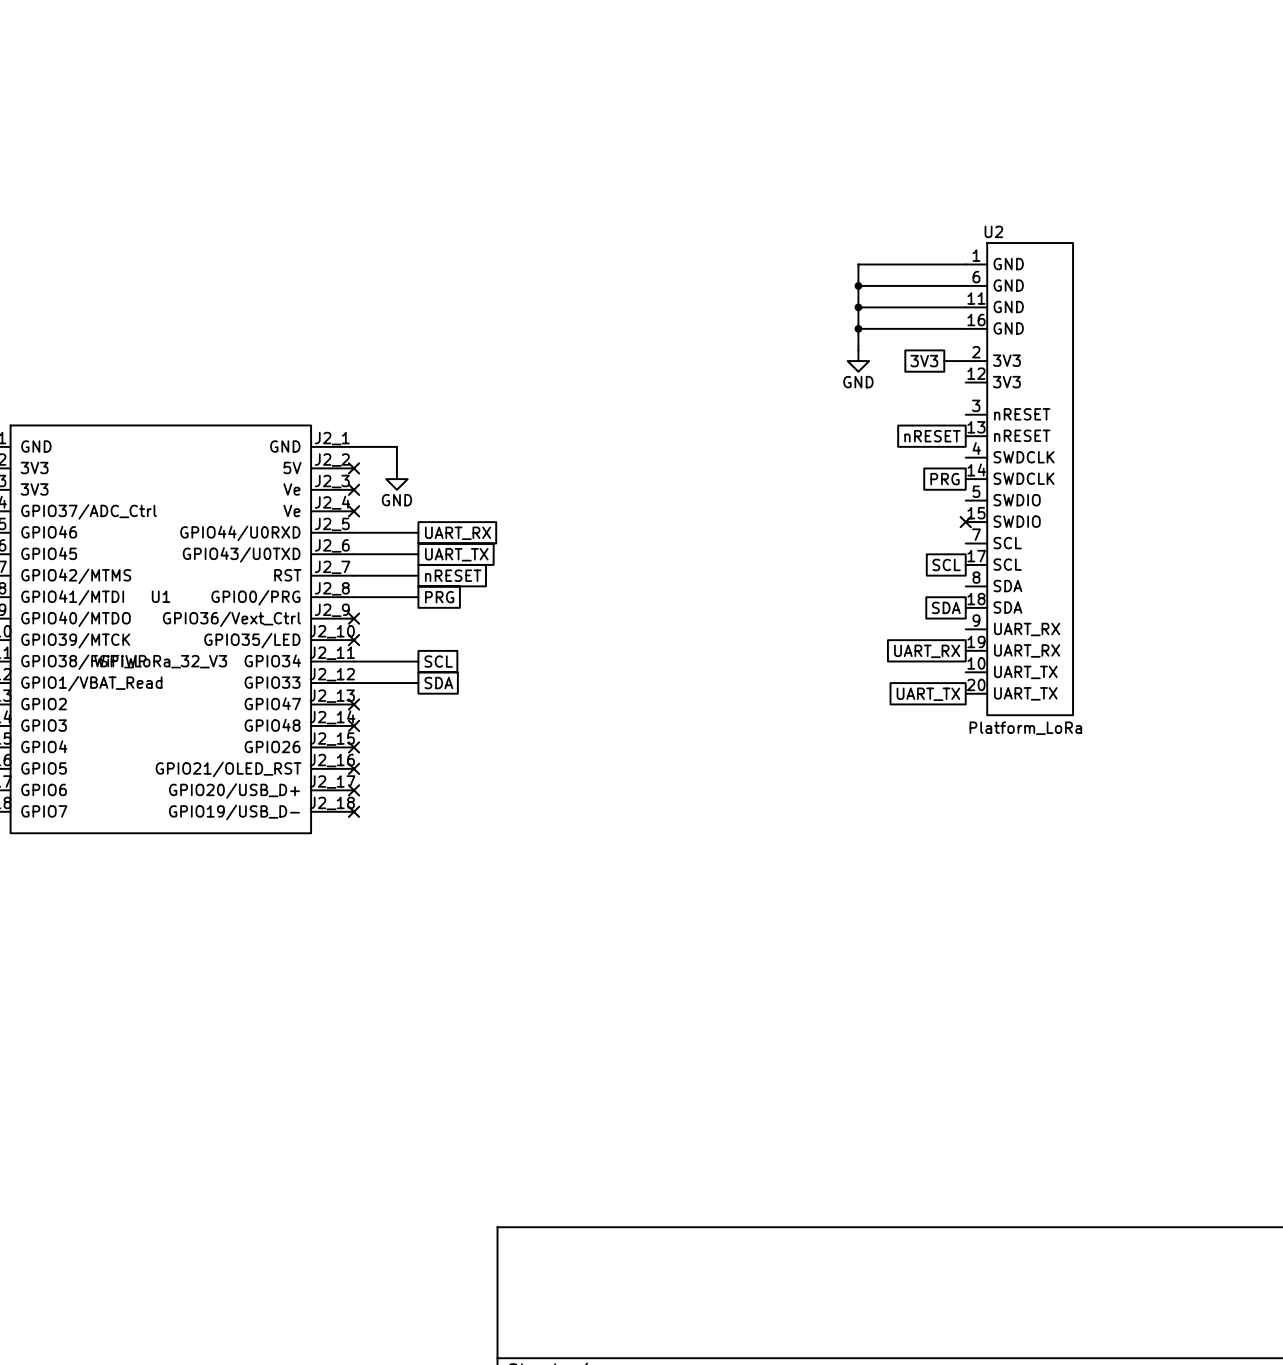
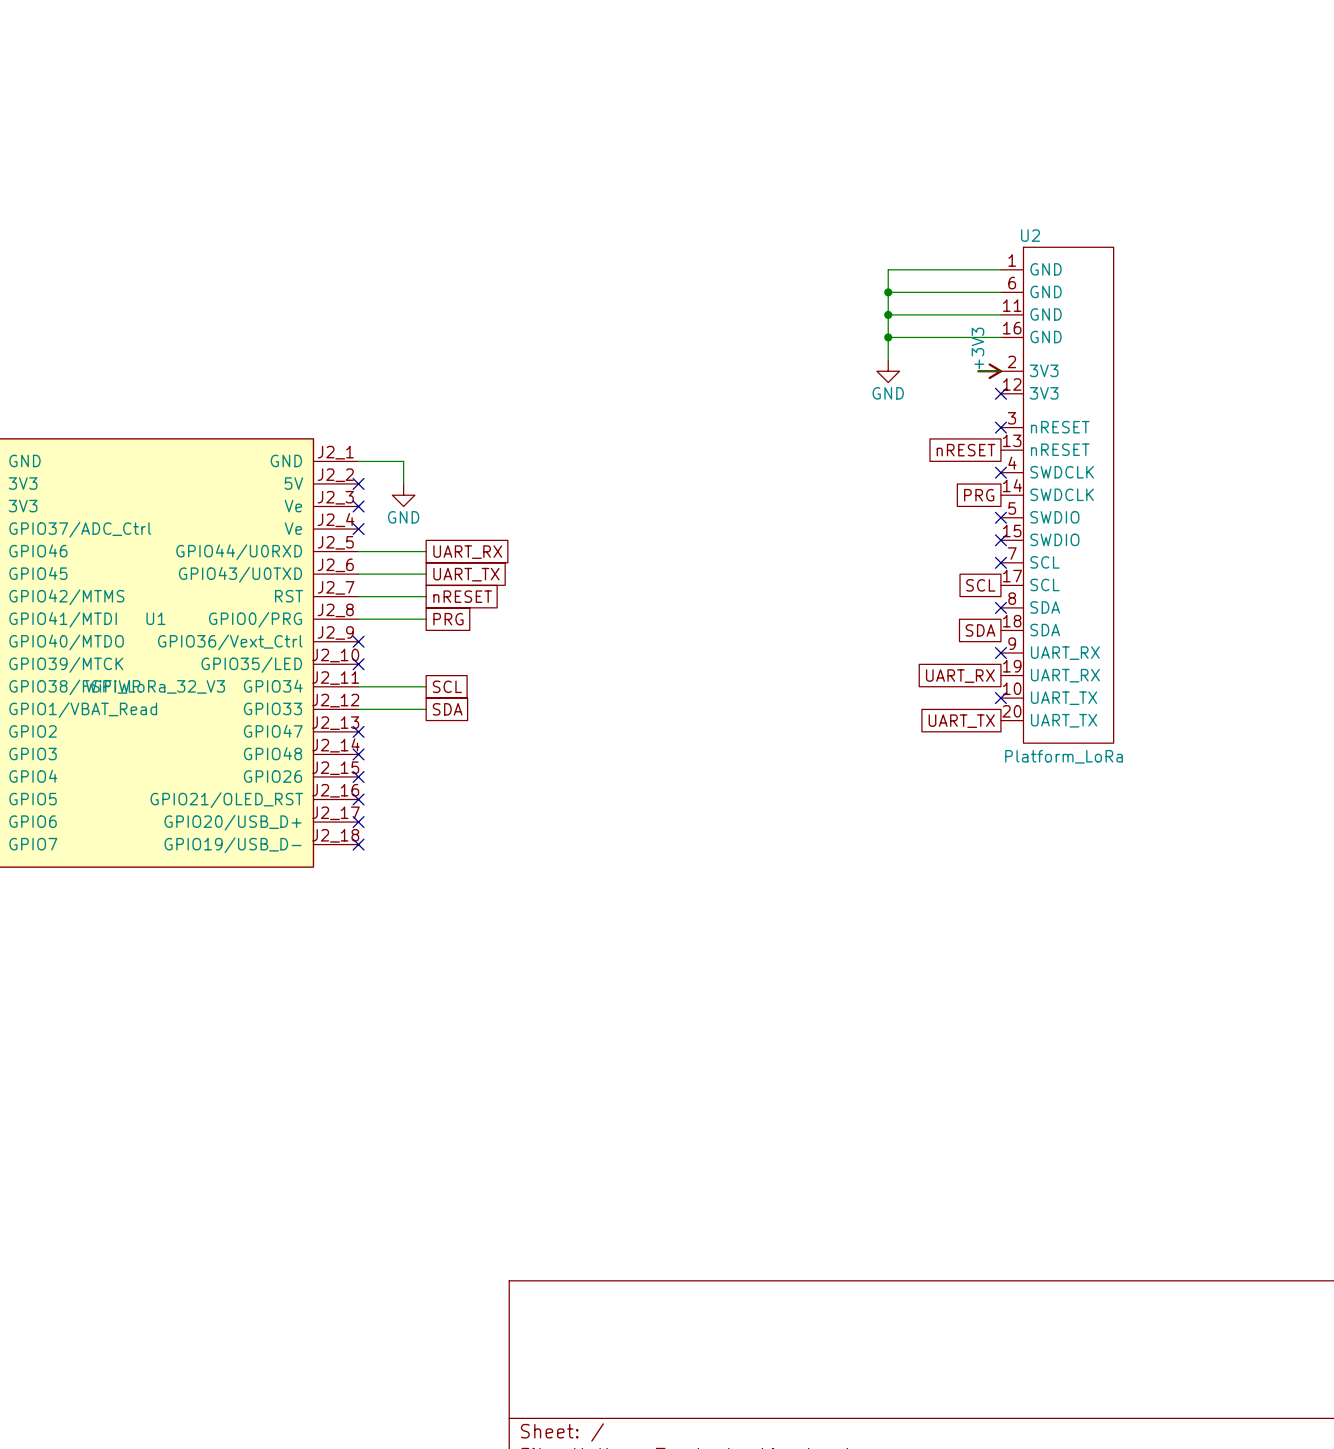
global label: 3V3 (924, 361) -> none
power symbol: none -> +3V3 (989, 371)
no-connect mark: none -> (1000, 393)
no-connect mark: none -> (1000, 427)
no-connect mark: none -> (1000, 472)
no-connect mark: none -> (1000, 517)
no-connect mark: none -> (1000, 562)
no-connect mark: none -> (1000, 607)
no-connect mark: none -> (1000, 653)
no-connect mark: none -> (1000, 698)

